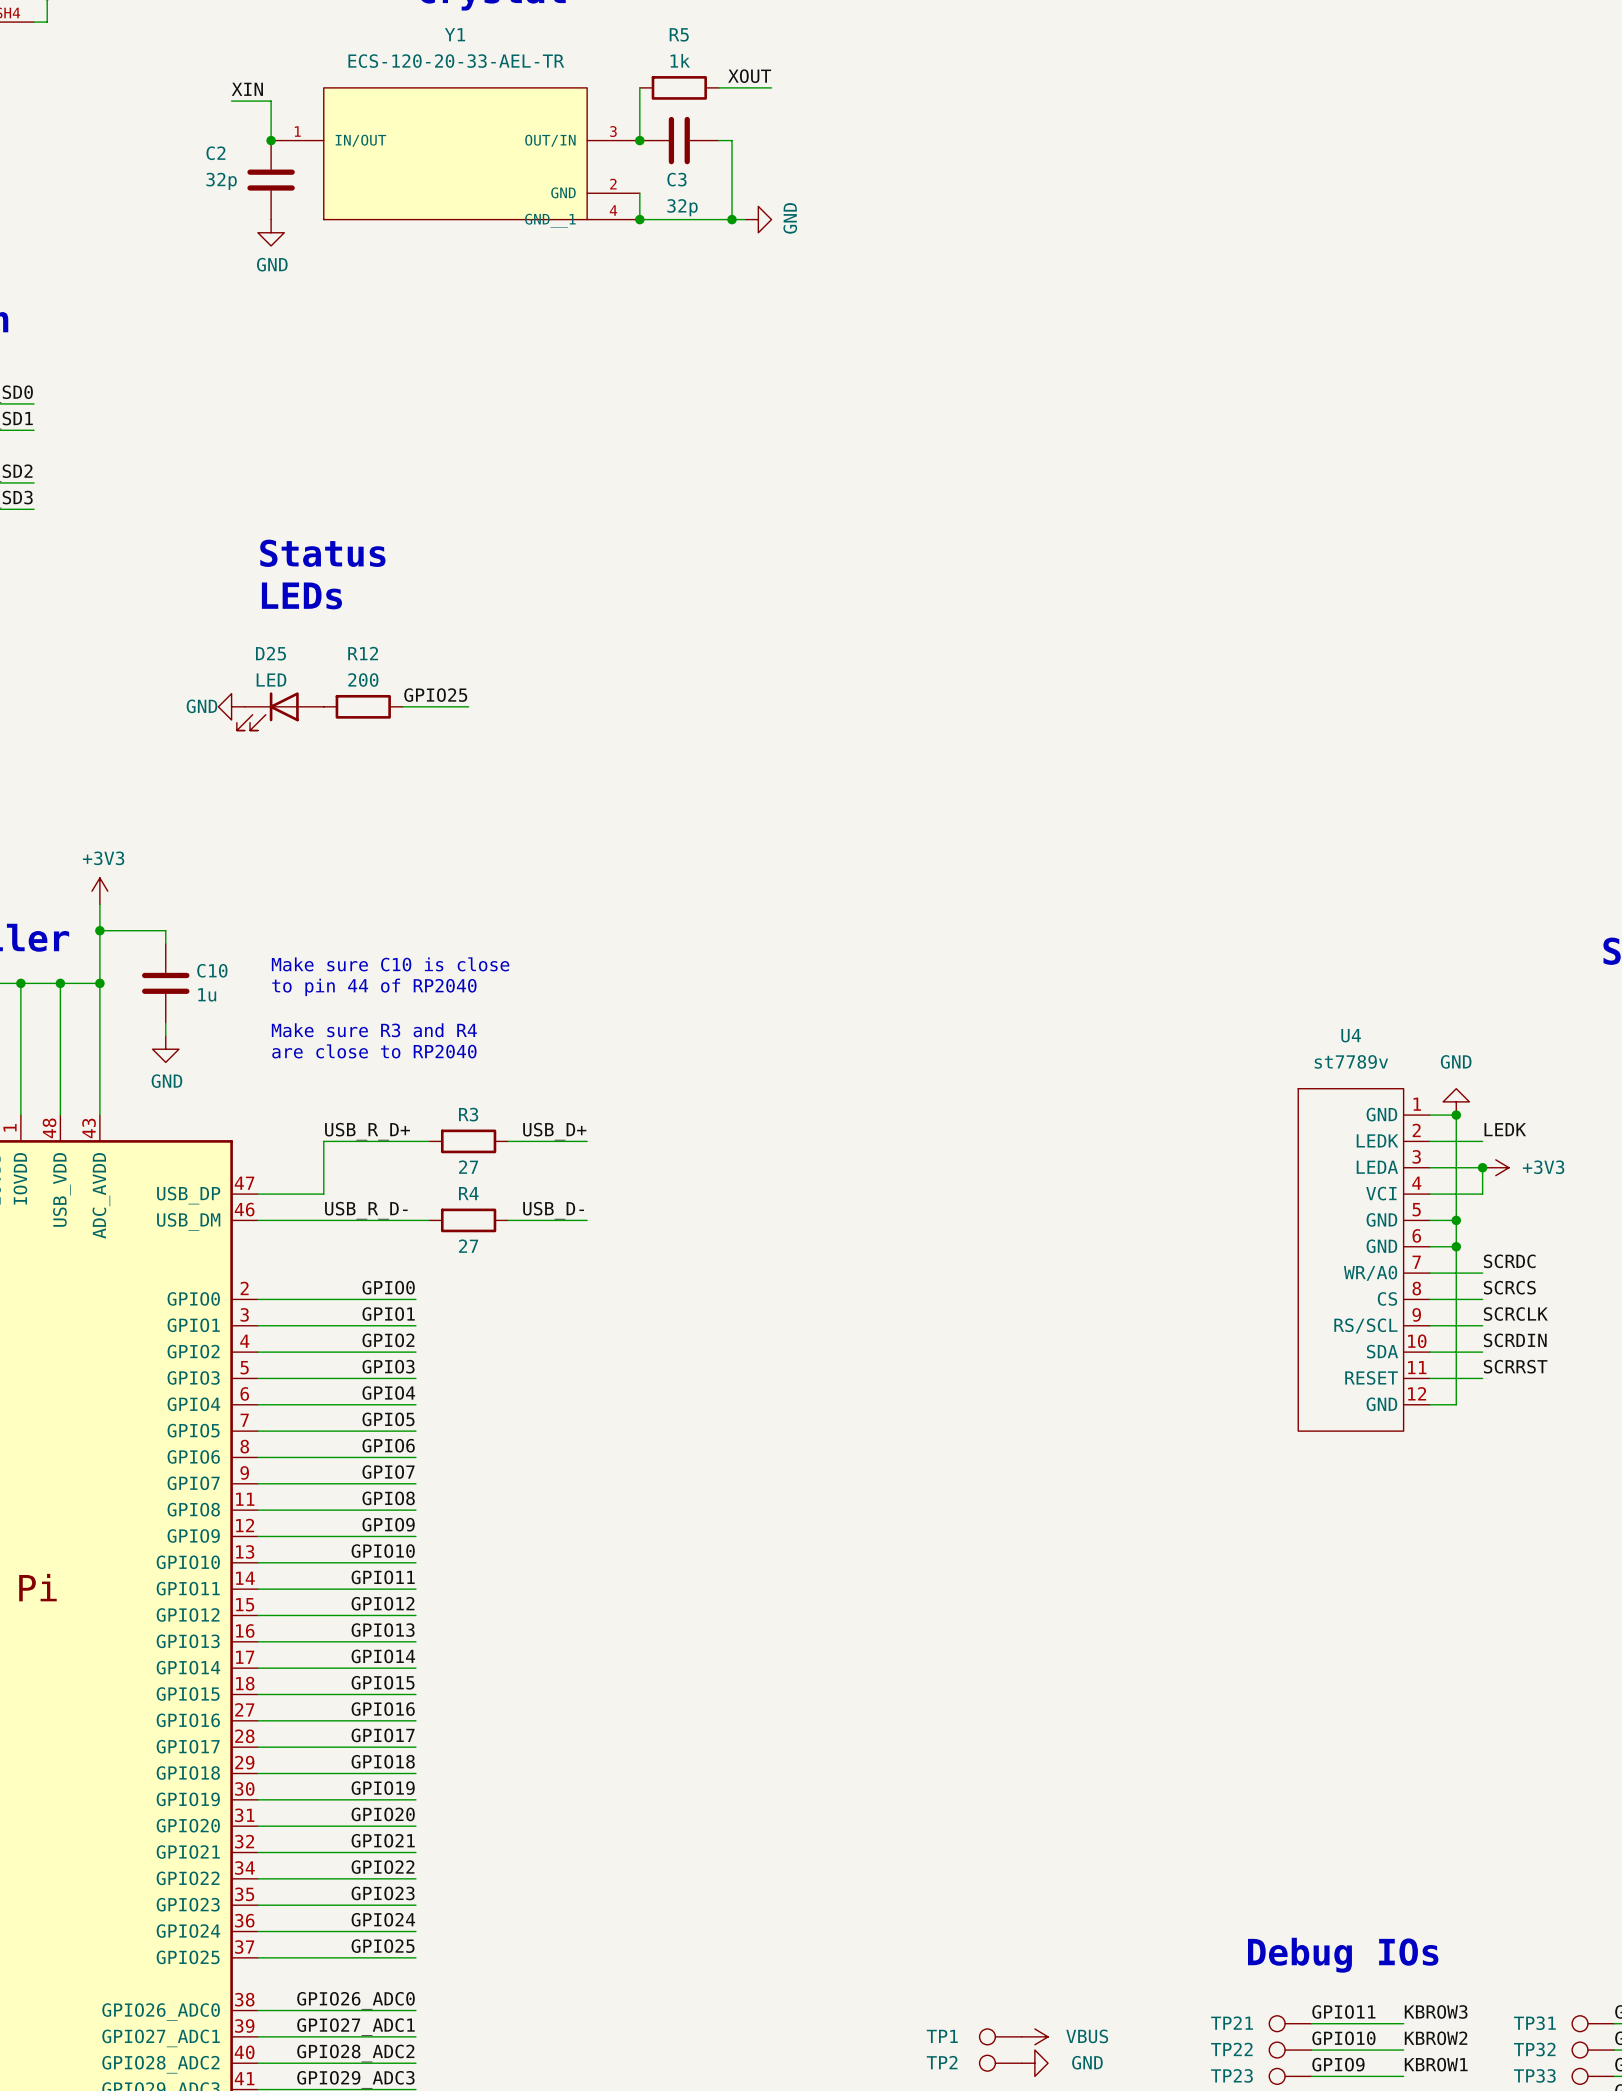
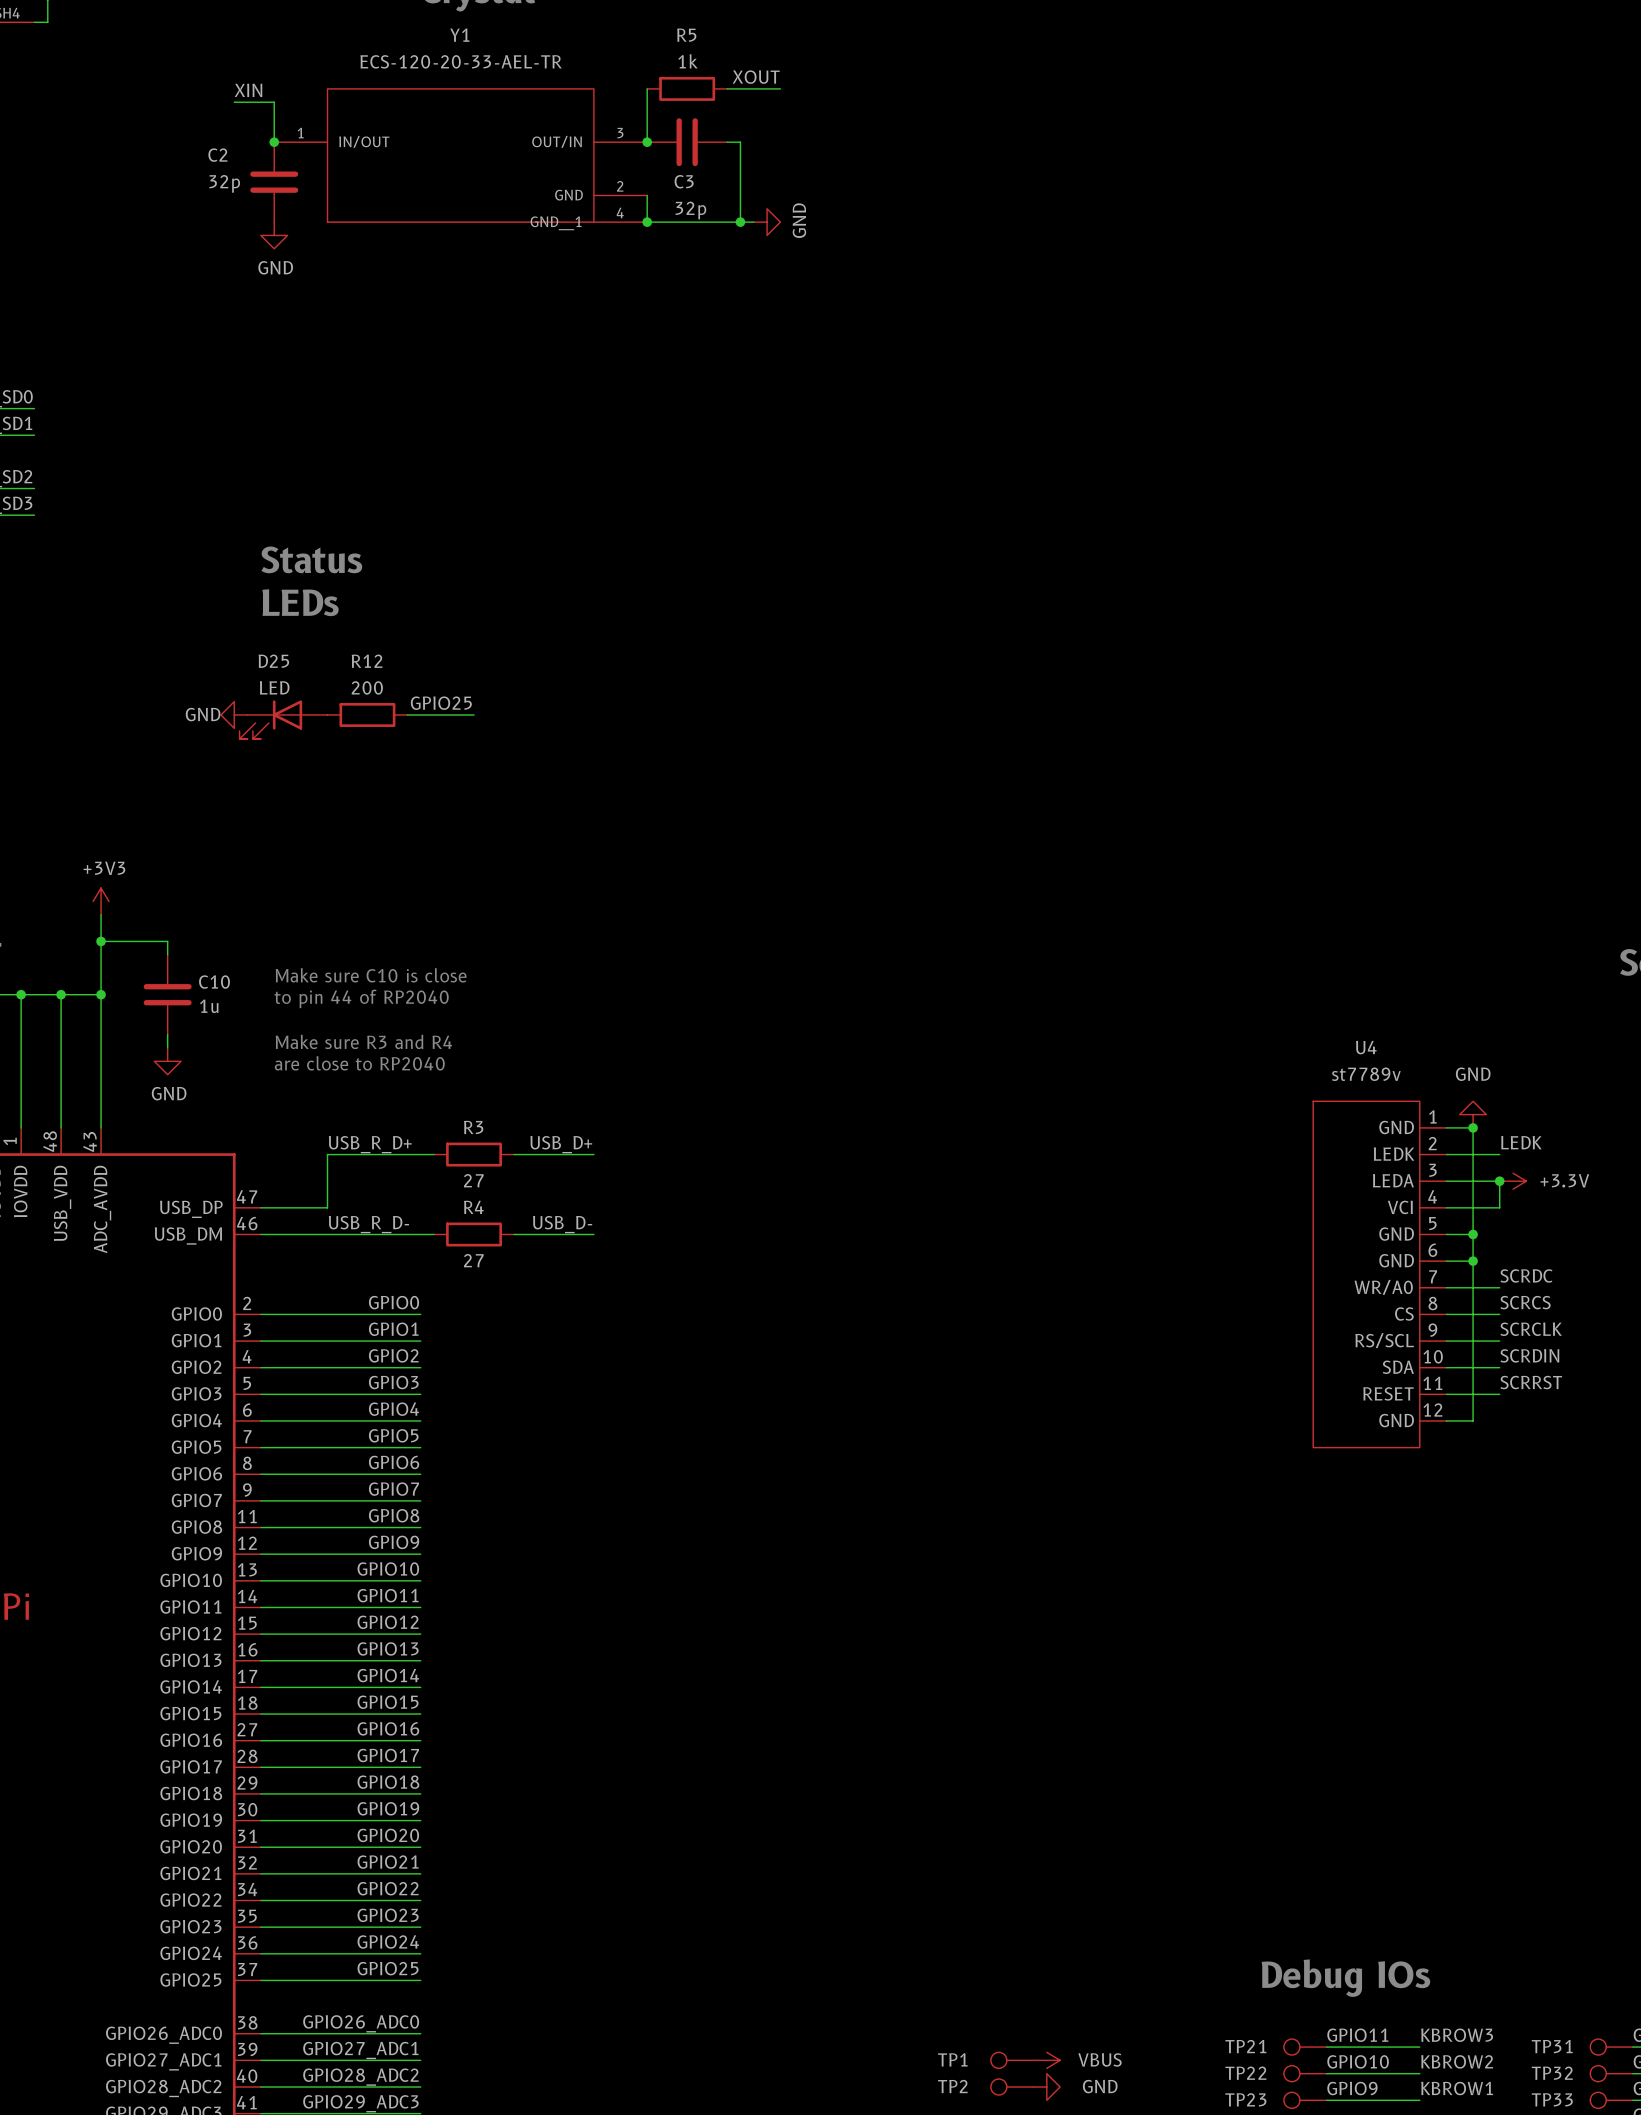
power symbol: +3V3 (1495, 1167) -> +3.3V (1513, 1181)

